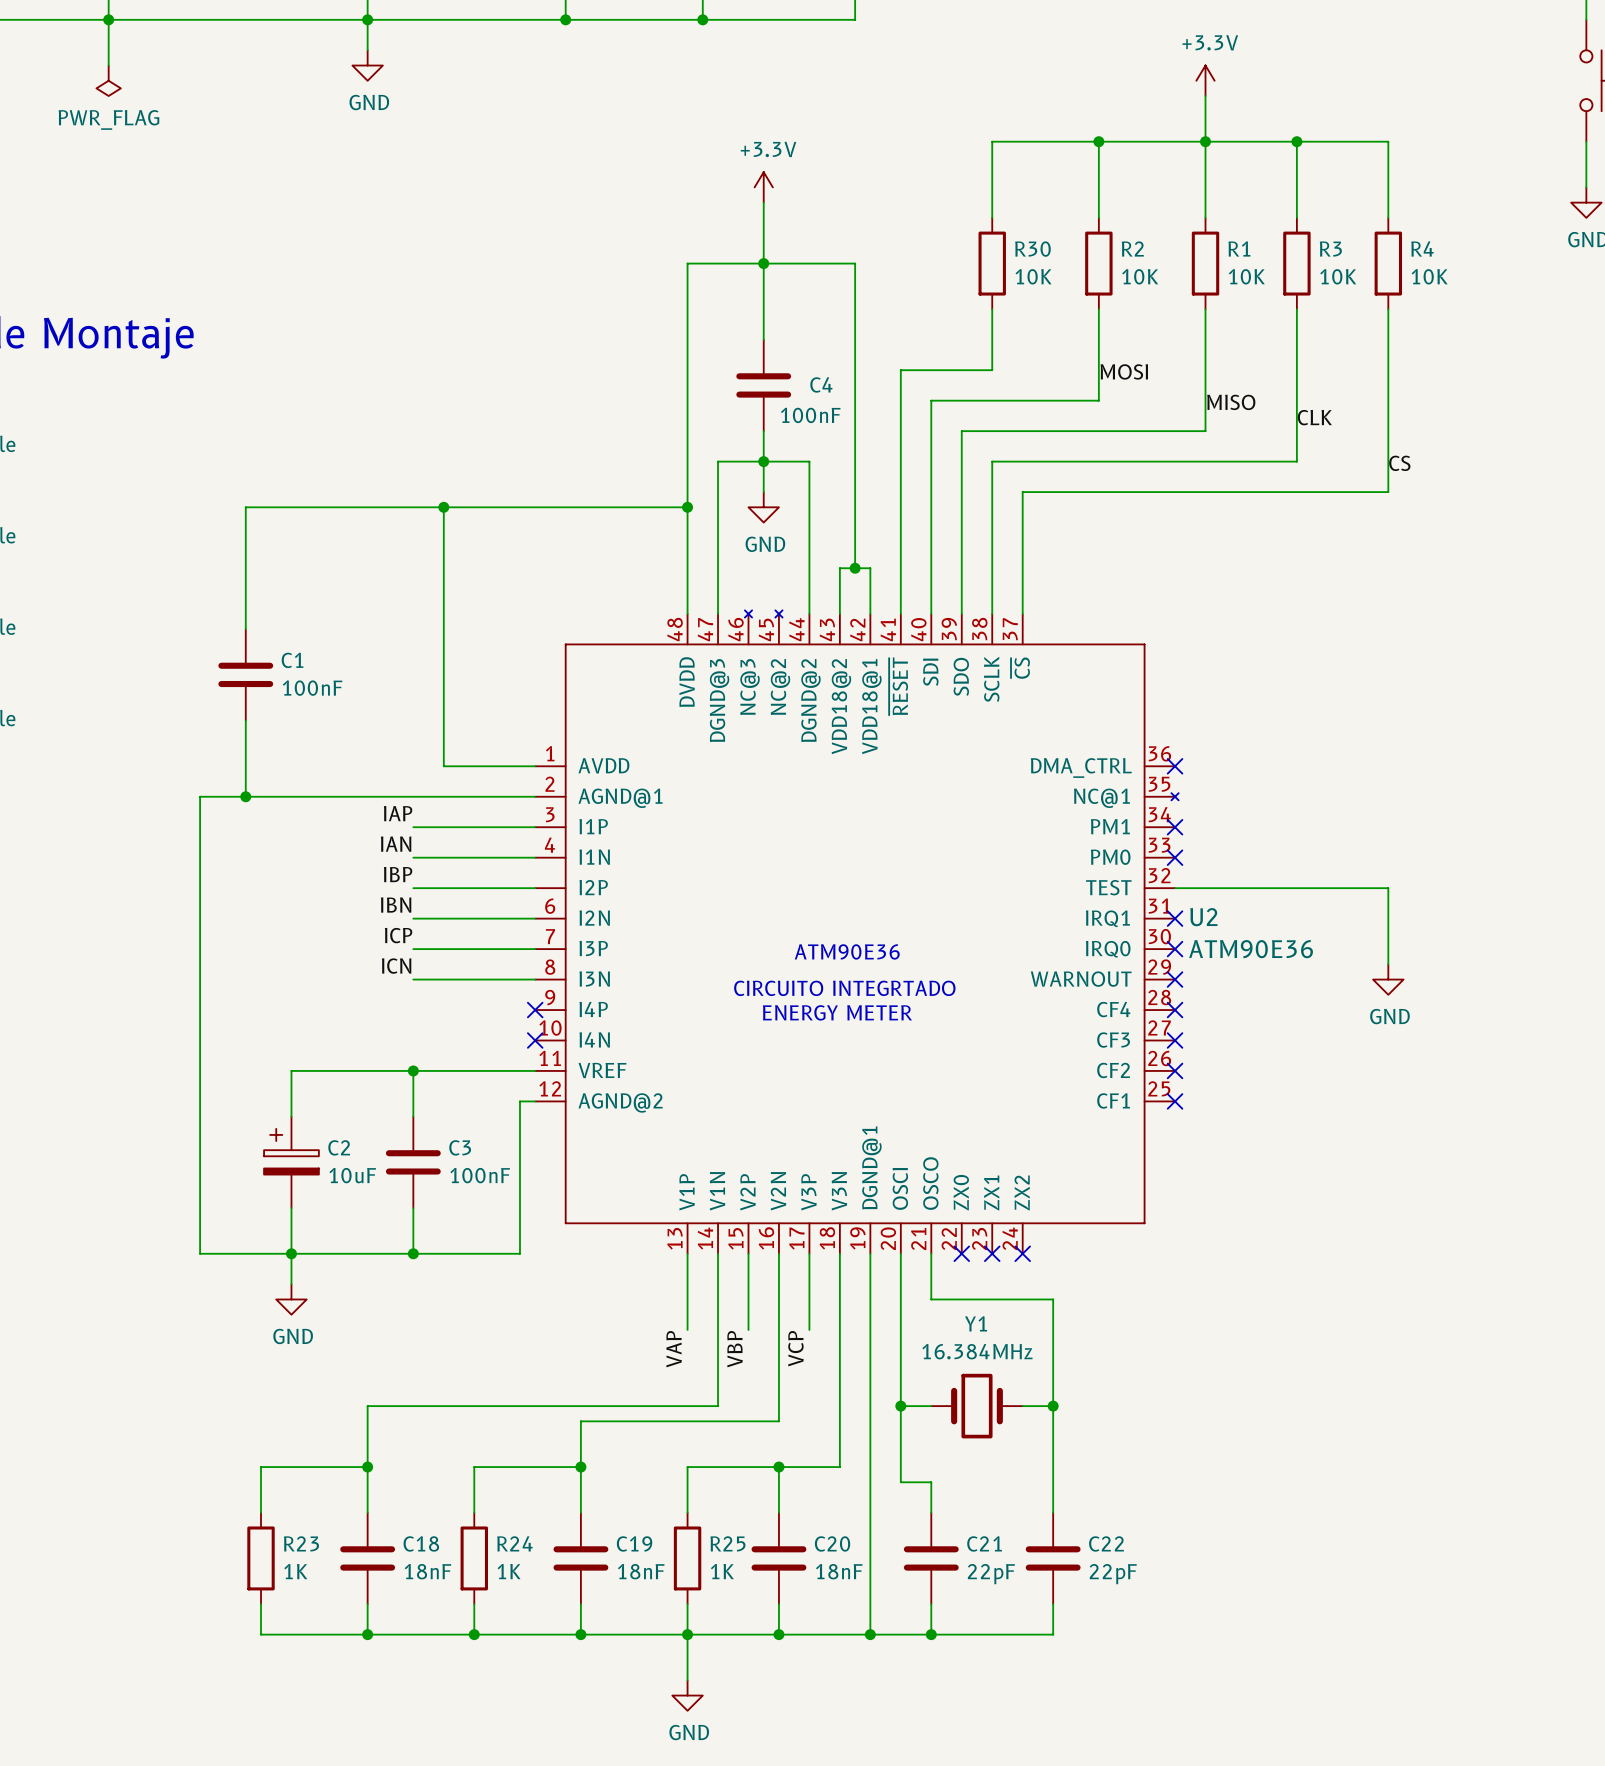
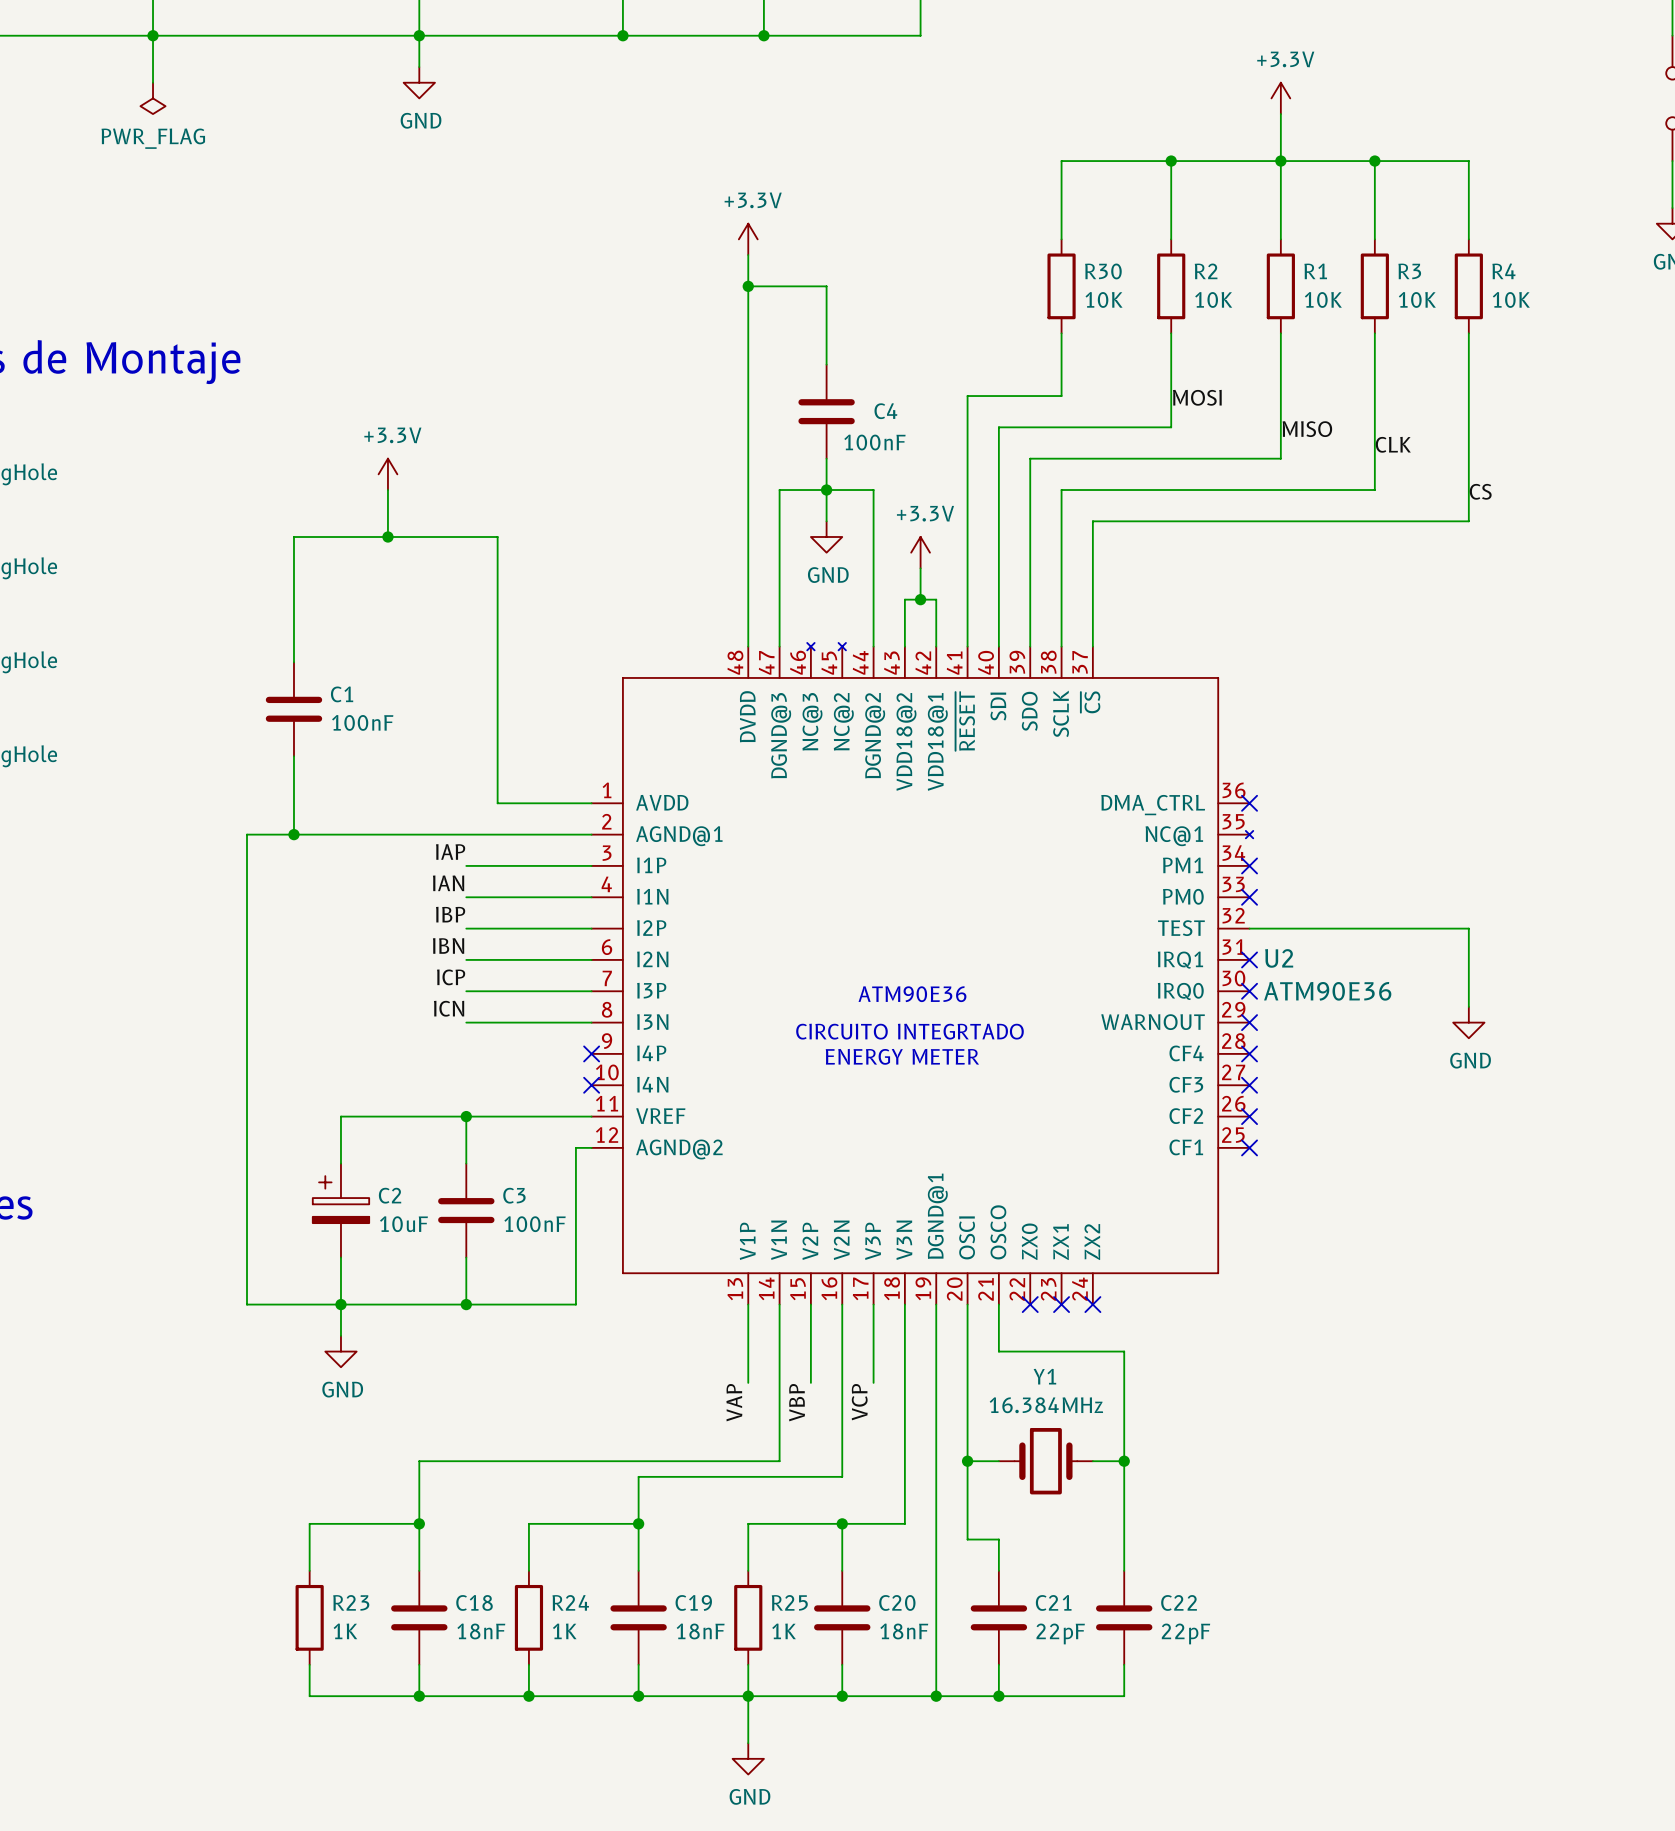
power symbol position: +3.3V (763, 187) -> +3.3V (748, 239)
wire: (763, 202) (763, 263) (855, 263) (855, 537) -> none
wire: none -> (748, 255) (748, 286)
junction: none -> (748, 286)
junction: (763, 263) -> none
power symbol: none -> +3.3V (387, 474)
wire: none -> (387, 490) (387, 537)
junction: none -> (387, 537)
wire: (443, 507) (687, 507) -> none
junction: (443, 507) -> none
junction: (687, 507) -> none
power symbol: none -> +3.3V (920, 552)

